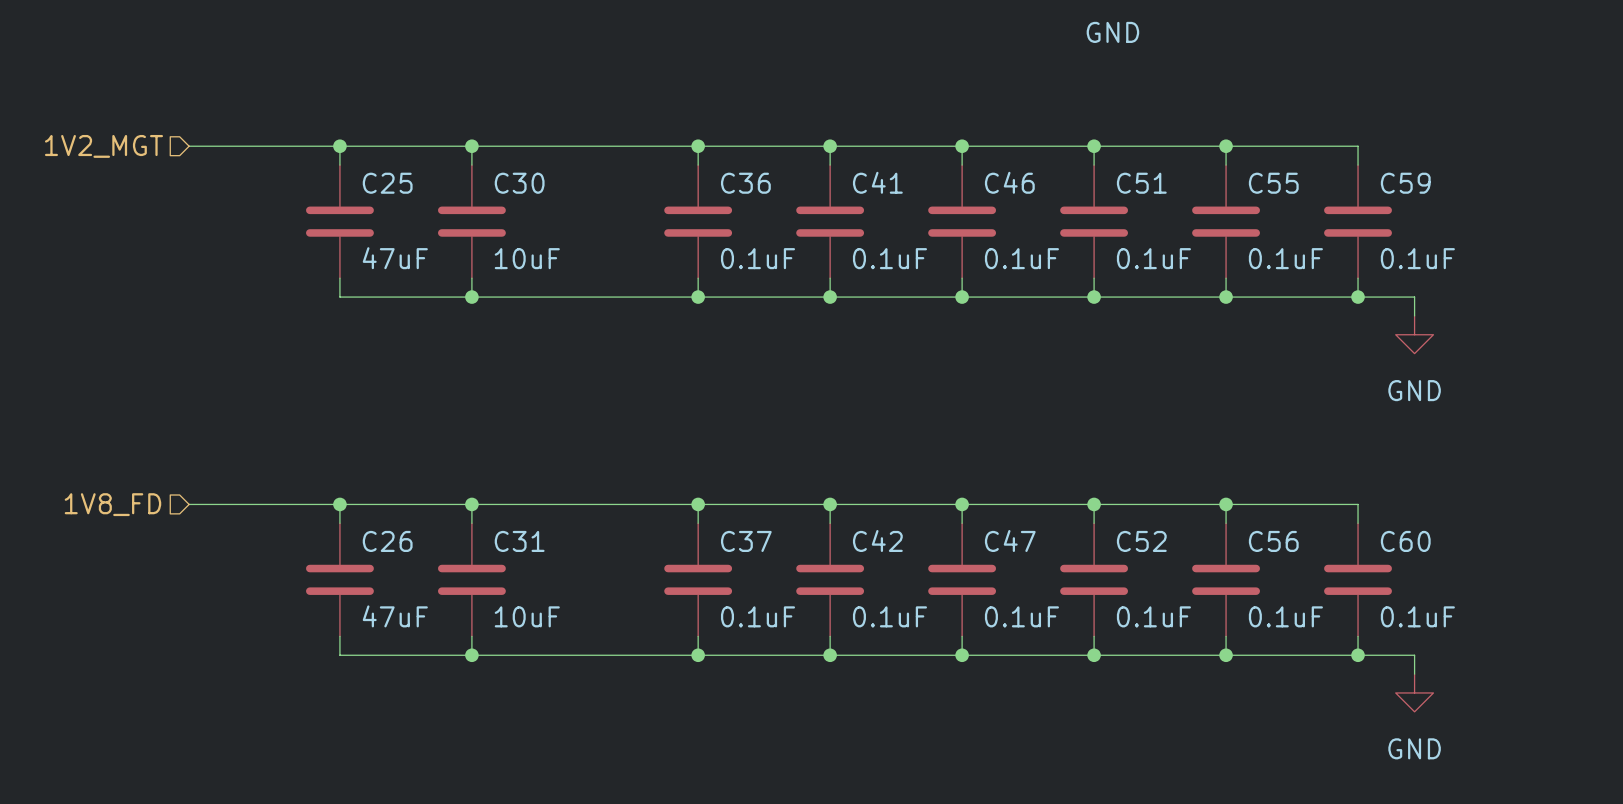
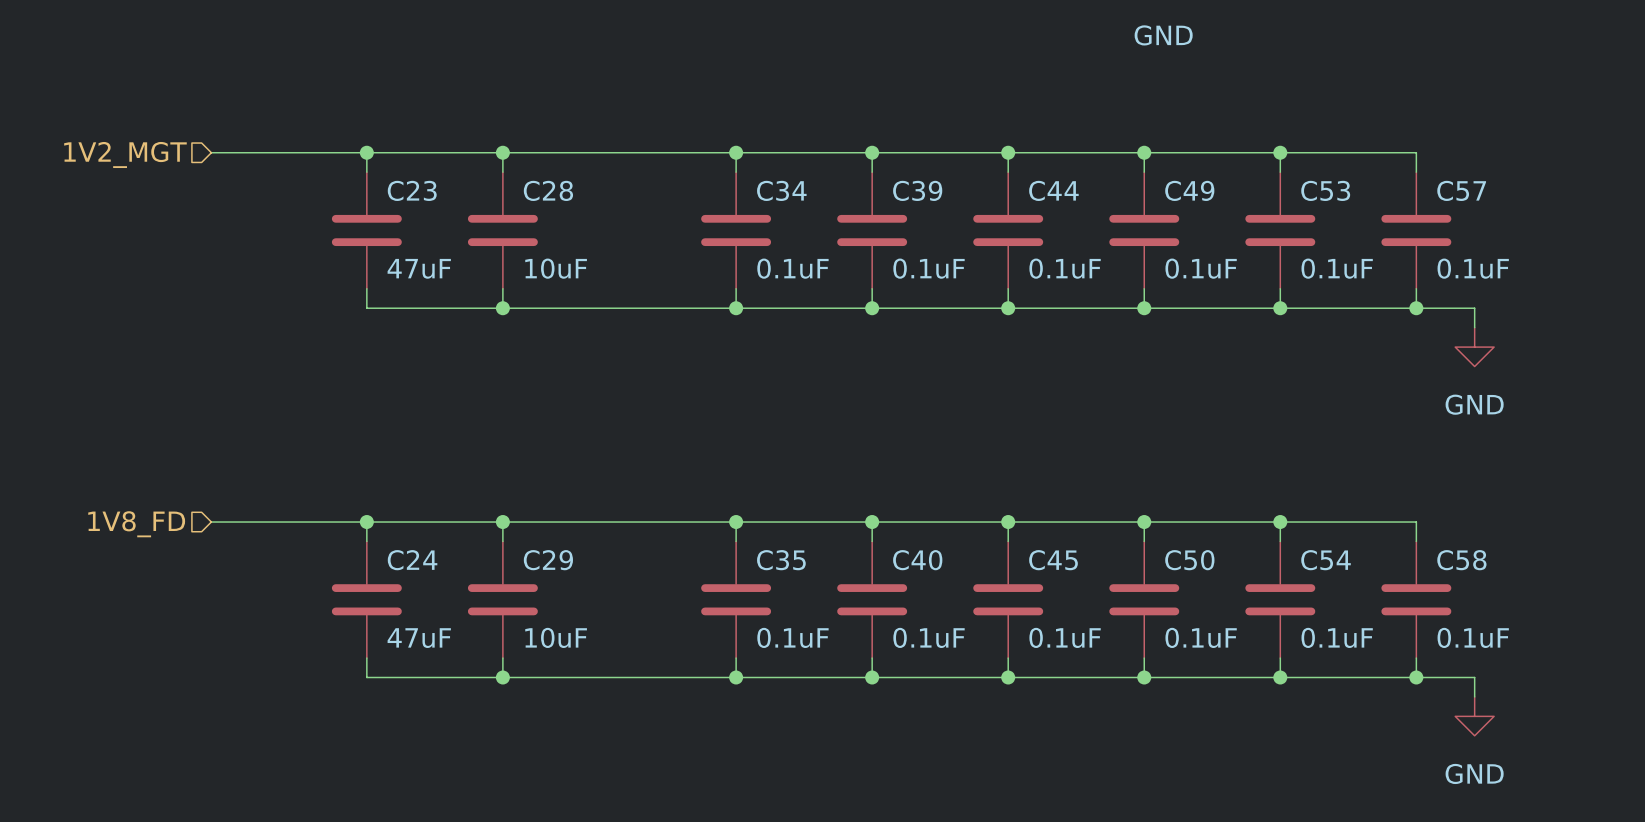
C41 name: C41 (877, 182) -> C39 (917, 190)
C46 name: C46 (1009, 182) -> C44 (1053, 190)
C25 name: C25 (387, 183) -> C23 (412, 190)
C30 name: C30 (519, 183) -> C28 (548, 190)
C36 name: C36 (745, 183) -> C34 (781, 190)
C51 name: C51 (1141, 183) -> C49 (1189, 190)
C55 name: C55 (1273, 183) -> C53 (1325, 190)
C59 name: C59 (1405, 183) -> C57 (1461, 190)
C42 name: C42 (877, 540) -> C40 (917, 560)
C47 name: C47 (1010, 540) -> C45 (1053, 560)
C26 name: C26 (387, 541) -> C24 (412, 560)
C31 name: C31 (519, 541) -> C29 (548, 560)
C37 name: C37 (746, 541) -> C35 (781, 560)
C52 name: C52 (1141, 541) -> C50 (1189, 560)
C56 name: C56 (1273, 541) -> C54 (1326, 560)
C60 name: C60 (1405, 541) -> C58 (1461, 560)

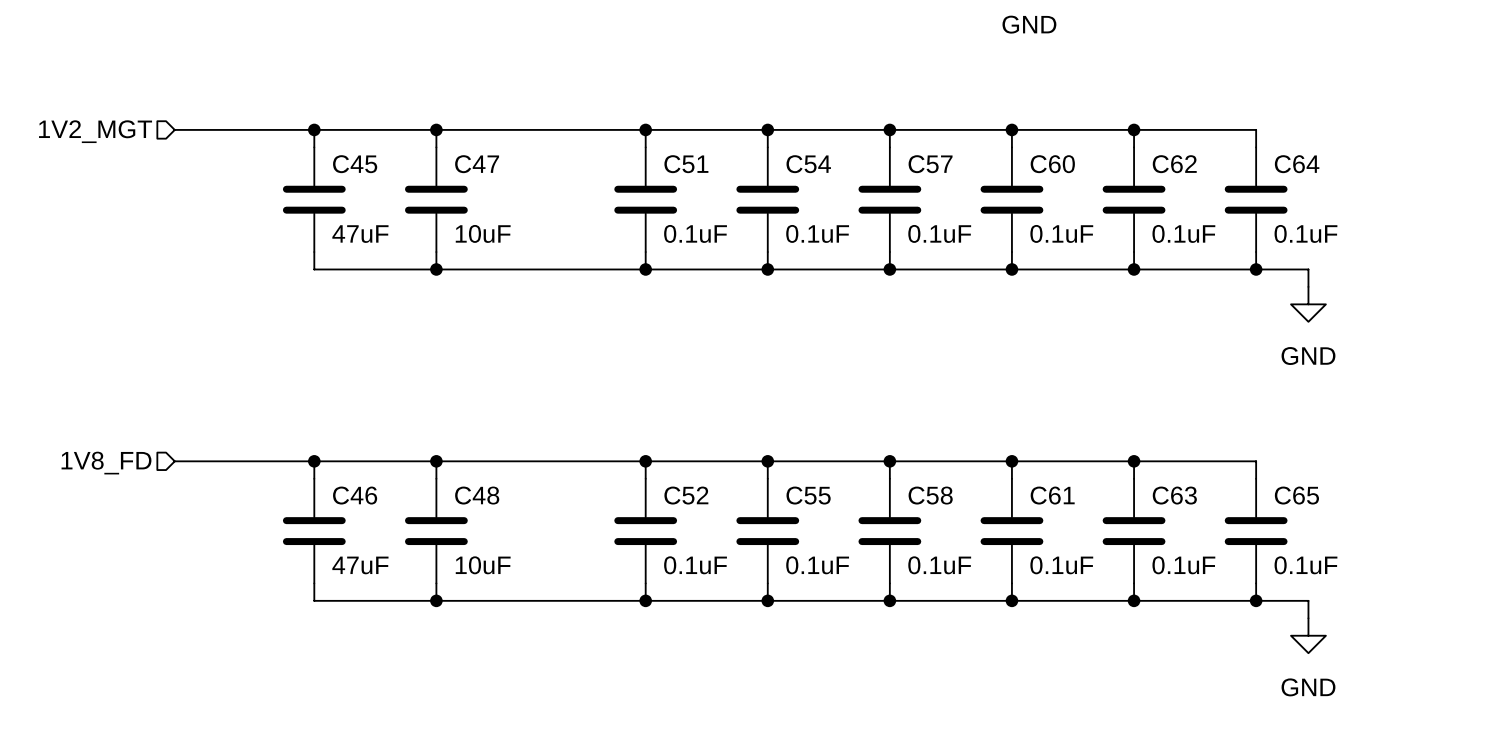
C23 name: C23 (412, 190) -> C45 (355, 164)
C28 name: C28 (548, 190) -> C47 (477, 164)
C34 name: C34 (781, 190) -> C51 (686, 164)
C39 name: C39 (917, 190) -> C54 (808, 164)
C44 name: C44 (1053, 190) -> C57 (930, 164)
C49 name: C49 (1189, 190) -> C60 (1052, 164)
C53 name: C53 (1325, 190) -> C62 (1174, 164)
C57 name: C57 (1461, 190) -> C64 (1297, 164)
C24 name: C24 (412, 560) -> C46 (355, 495)
C29 name: C29 (548, 560) -> C48 (477, 495)
C35 name: C35 (781, 560) -> C52 (686, 495)
C40 name: C40 (917, 560) -> C55 (808, 495)
C45 name: C45 (1053, 560) -> C58 (930, 495)
C50 name: C50 (1189, 560) -> C61 (1052, 495)
C54 name: C54 (1326, 560) -> C63 (1174, 495)
C58 name: C58 (1461, 560) -> C65 (1296, 495)

